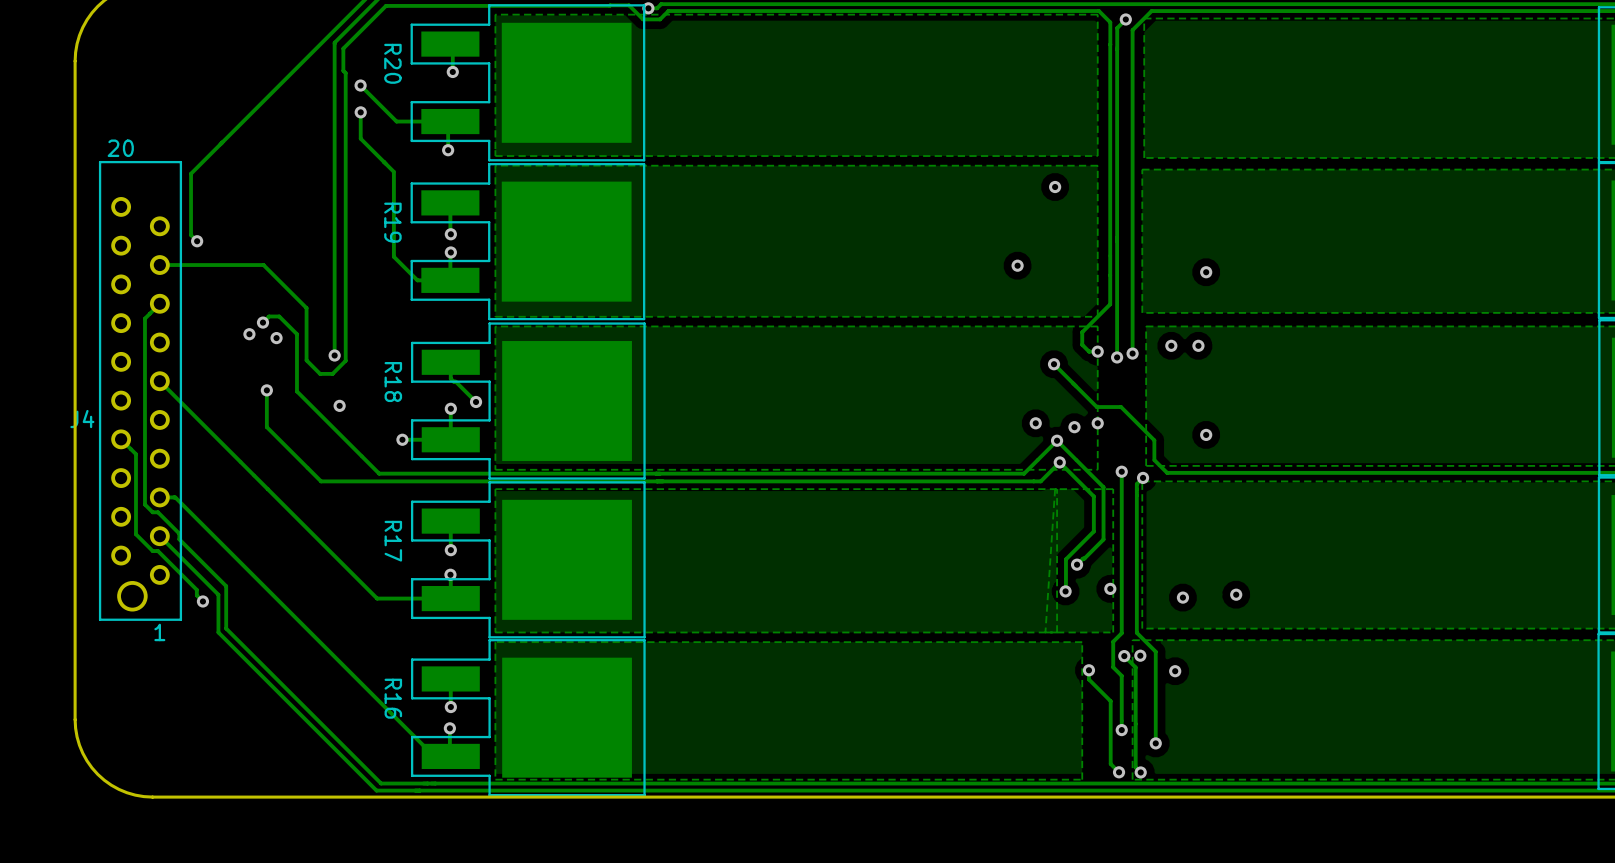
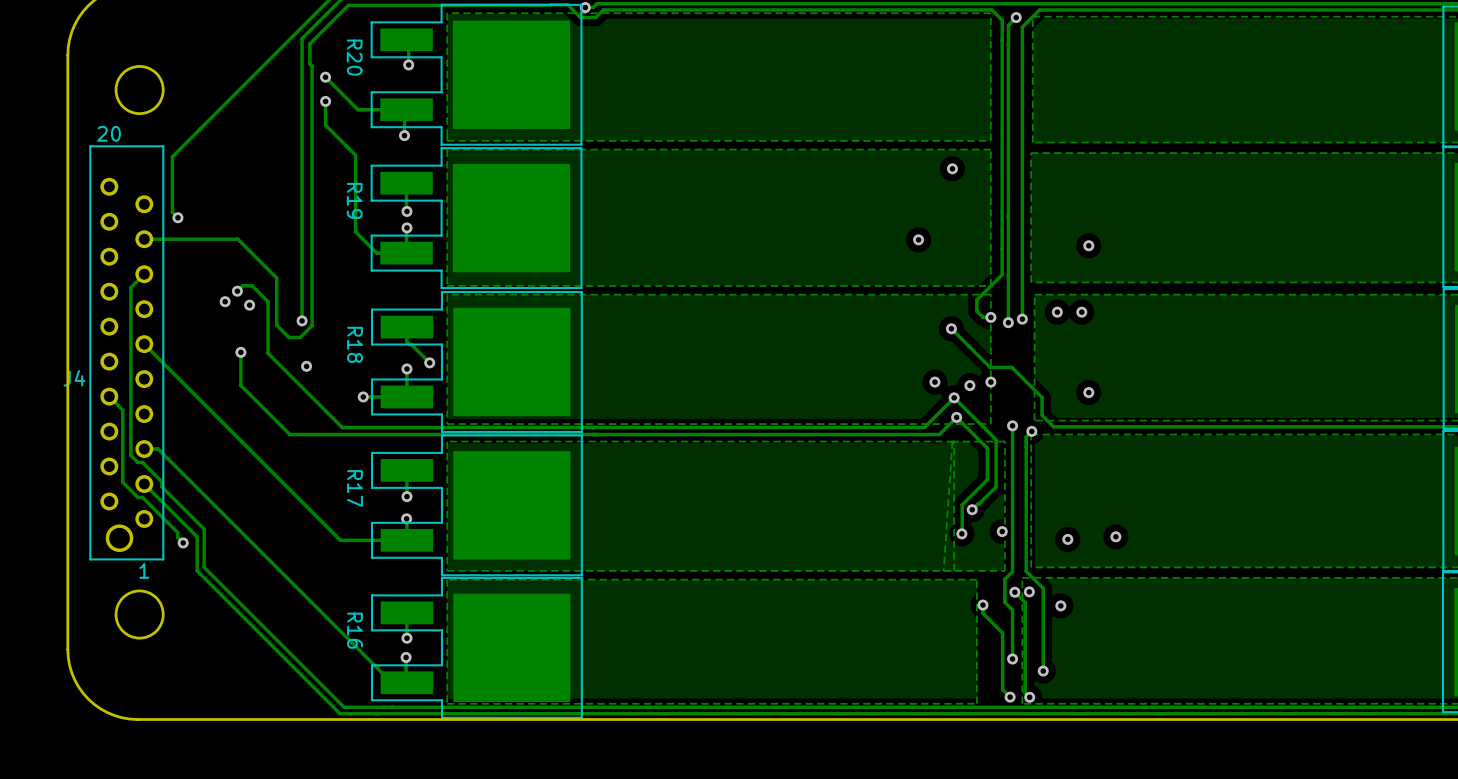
round board edge: none -> [114, 65, 165, 116]
round board edge: none -> [114, 589, 165, 640]

